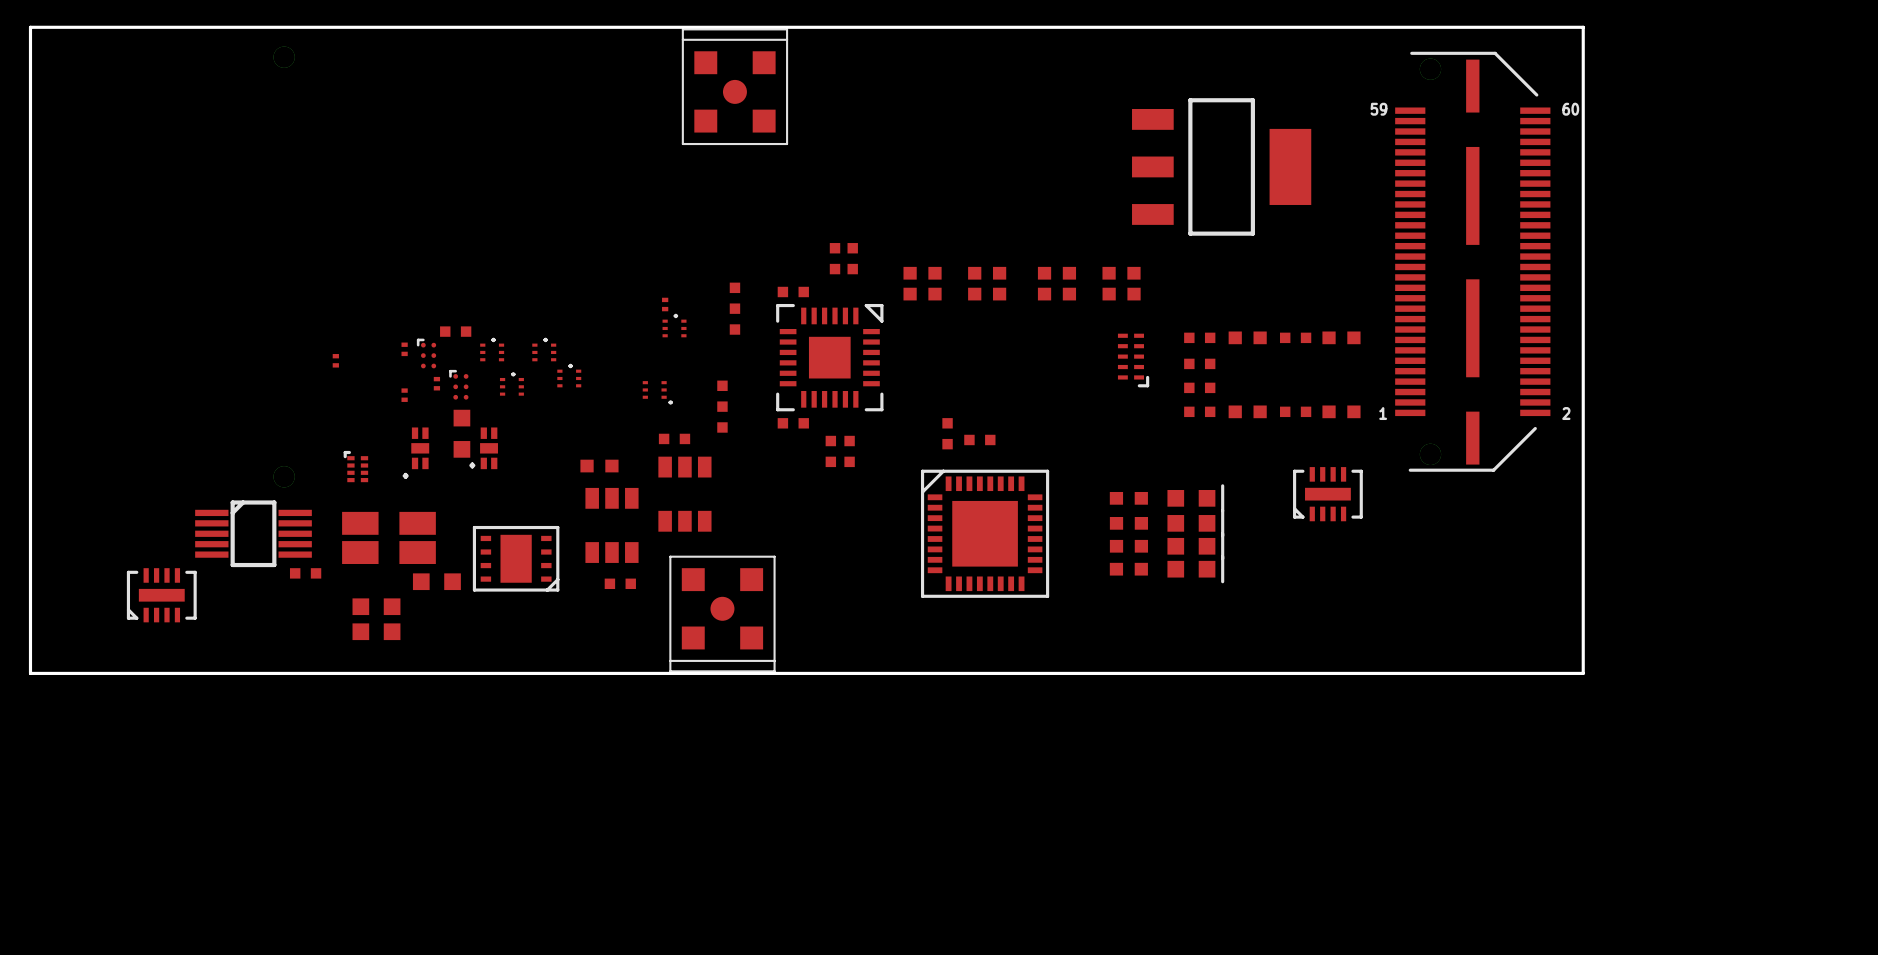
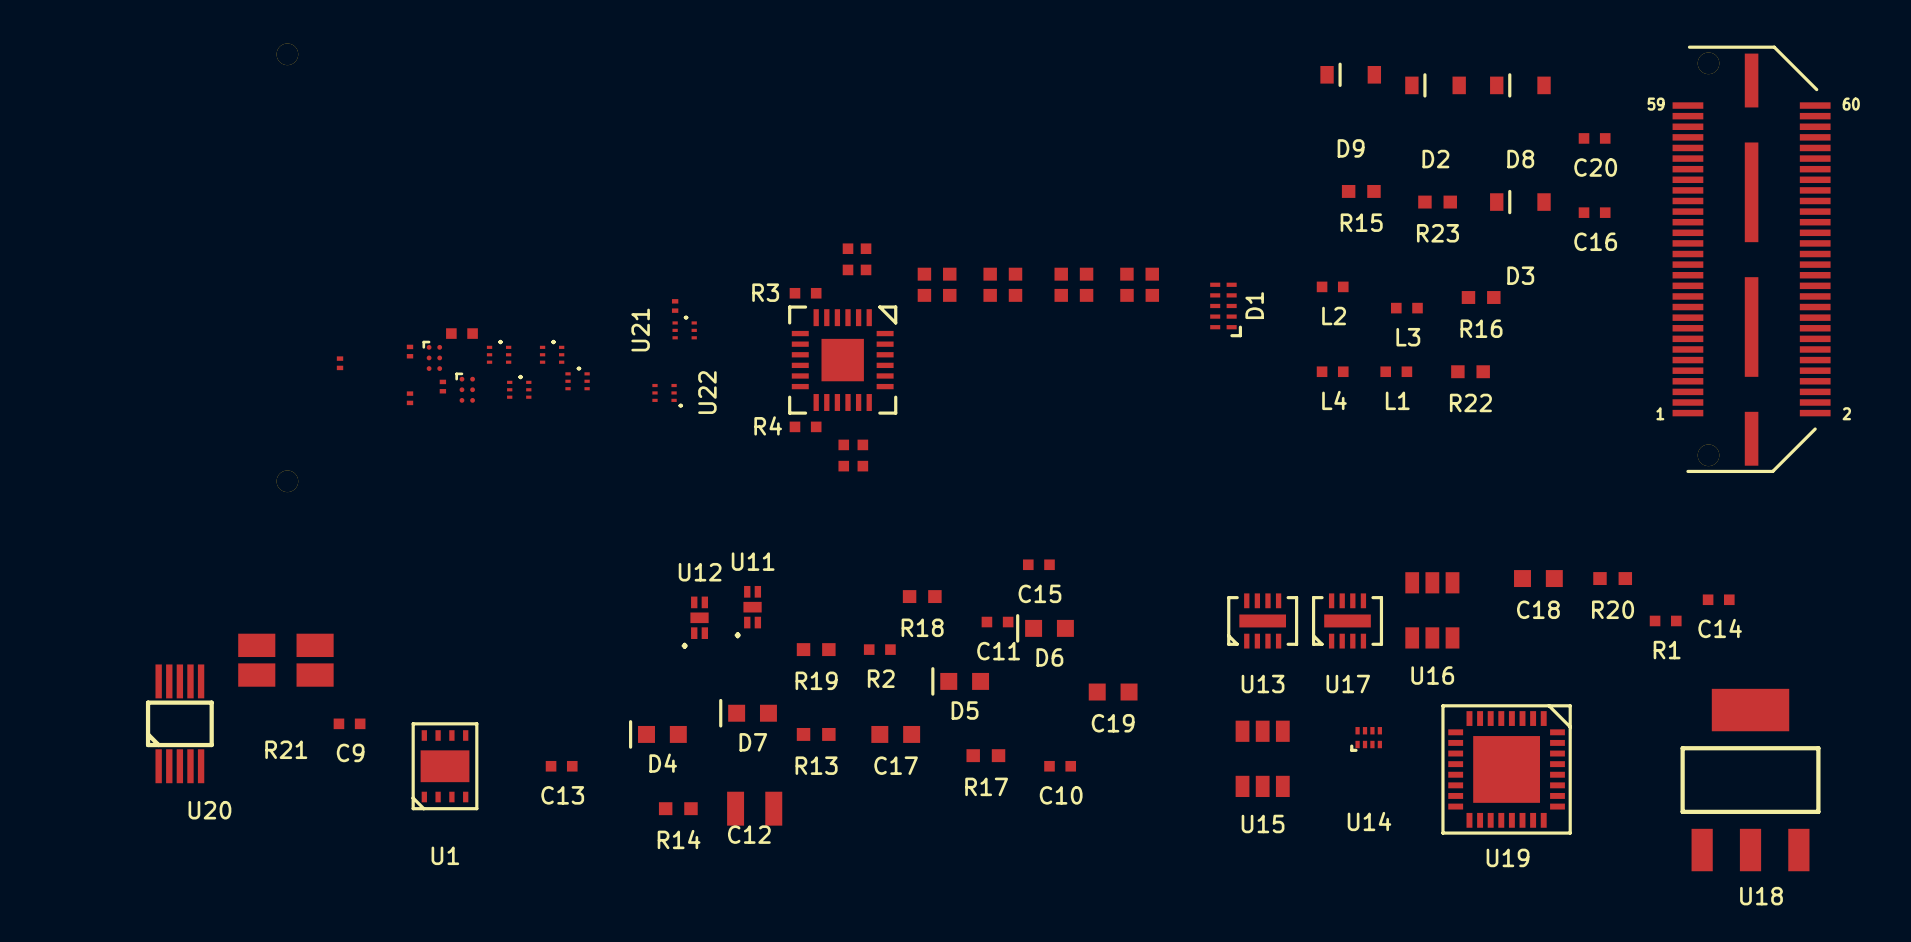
board edge: (30, 27) (1583, 27) (1583, 673) (30, 673) (30, 27) -> none
D9: none -> (1350, 74)
part: (734, 86) -> none
D2: none -> (1435, 85)
D8: none -> (1520, 85)
C20: none -> (1594, 138)
part: (1221, 166) -> none
R15: none -> (1361, 191)
R23: none -> (1437, 202)
D3: none -> (1520, 202)
C16: none -> (1594, 212)
part position: (1472, 261) -> (1751, 259)
L2: none -> (1332, 286)
R3 name: none -> R3 (765, 292)
R16: none -> (1481, 297)
L3: none -> (1406, 308)
part: (734, 308) -> none
D1: none -> (1226, 309)
U21 name: none -> U21 (640, 330)
part: (1199, 337) -> none
part: (1247, 337) -> none
part: (1295, 337) -> none
part: (1341, 337) -> none
part: (1133, 360) -> none
part: (1199, 363) -> none
L4: none -> (1332, 371)
L1: none -> (1396, 371)
R22: none -> (1470, 371)
part: (1199, 387) -> none
U22 name: none -> U22 (707, 392)
part: (722, 406) -> none
part: (1199, 411) -> none
part: (1247, 411) -> none
part: (1295, 411) -> none
part: (1341, 411) -> none
R4 name: none -> R4 (768, 425)
part: (461, 433) -> none
part: (947, 433) -> none
part: (674, 438) -> none
part: (979, 439) -> none
part: (420, 448) -> none
part: (489, 448) -> none
part: (355, 466) -> none
part: (599, 466) -> none
part: (684, 494) -> none
part: (1327, 494) -> none
part: (1128, 498) -> none
part: (1195, 498) -> none
part: (1128, 523) -> none
part: (1195, 523) -> none
part: (611, 525) -> none
part: (253, 533) -> none
part: (985, 533) -> none
part: (388, 537) -> none
part: (1128, 546) -> none
part: (1195, 546) -> none
part: (516, 558) -> none
C15: none -> (1038, 564)
part: (1128, 569) -> none
part: (1195, 569) -> none
C18: none -> (1538, 578)
R20: none -> (1612, 578)
part: (305, 573) -> none
part: (436, 581) -> none
part: (620, 583) -> none
R18: none -> (922, 596)
C14: none -> (1718, 599)
part: (161, 595) -> none
U11: none -> (752, 607)
U16: none -> (1432, 610)
part: (376, 606) -> none
U12: none -> (699, 617)
part: (722, 614) -> none
U13: none -> (1262, 620)
U17: none -> (1347, 620)
R1: none -> (1665, 620)
C11: none -> (997, 622)
D6: none -> (1044, 628)
part: (376, 631) -> none
R19: none -> (816, 649)
R2: none -> (879, 649)
R21: none -> (285, 660)
D5: none -> (960, 681)
C19: none -> (1113, 692)
D7: none -> (748, 713)
U20: none -> (179, 723)
C9: none -> (349, 723)
D4: none -> (657, 734)
R13: none -> (816, 734)
C17: none -> (895, 734)
U14: none -> (1366, 739)
R17: none -> (985, 755)
U15: none -> (1262, 758)
U1: none -> (445, 766)
C13: none -> (561, 766)
C10: none -> (1060, 766)
U19: none -> (1506, 769)
U18: none -> (1750, 780)
R14: none -> (678, 808)
C12: none -> (754, 808)

